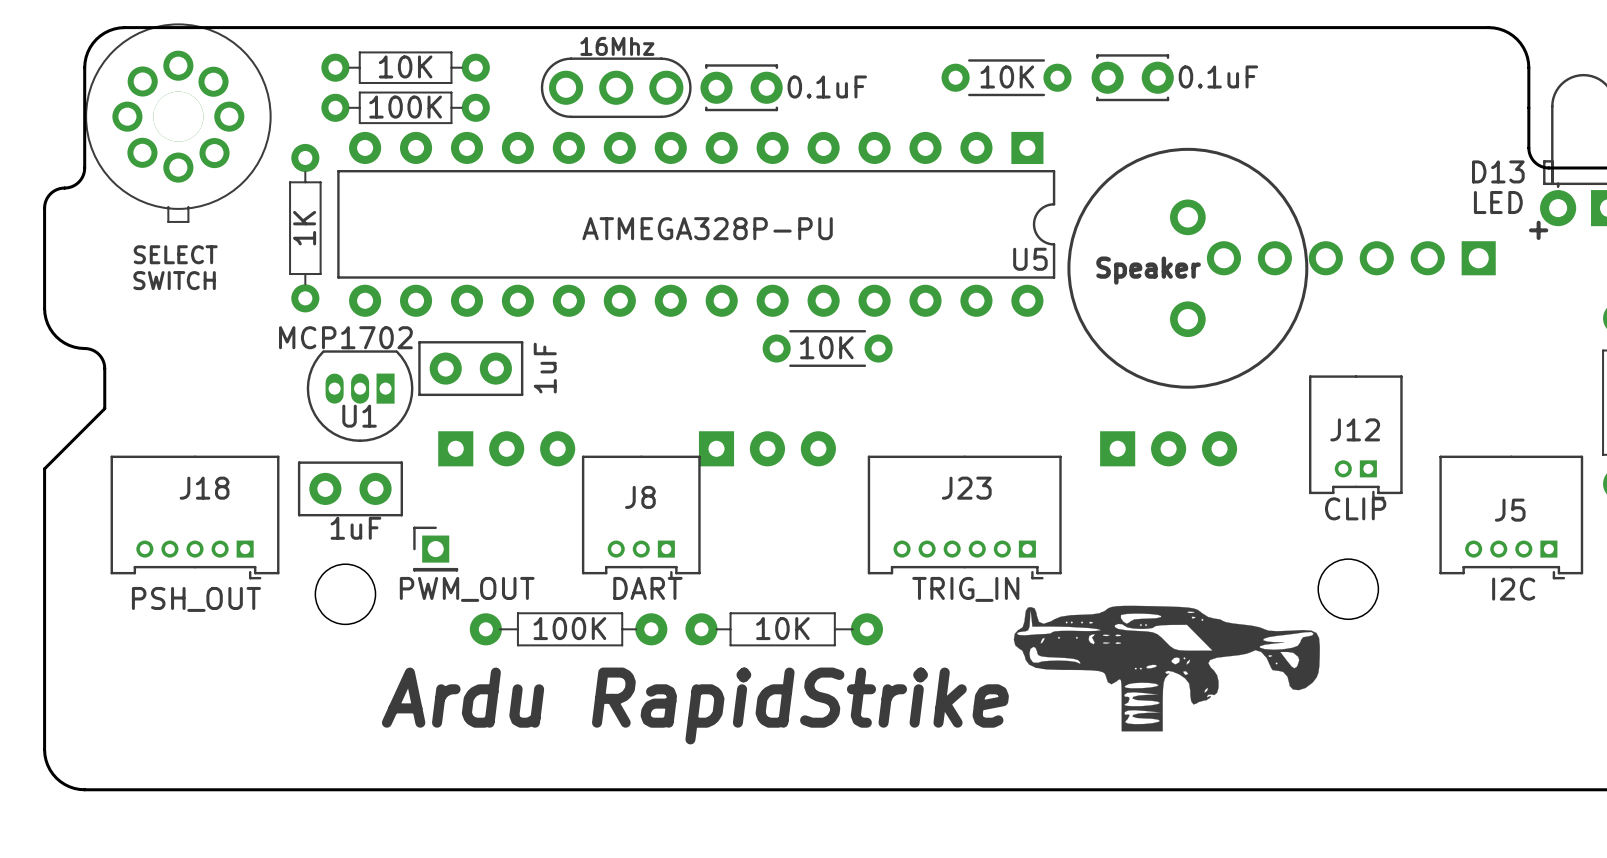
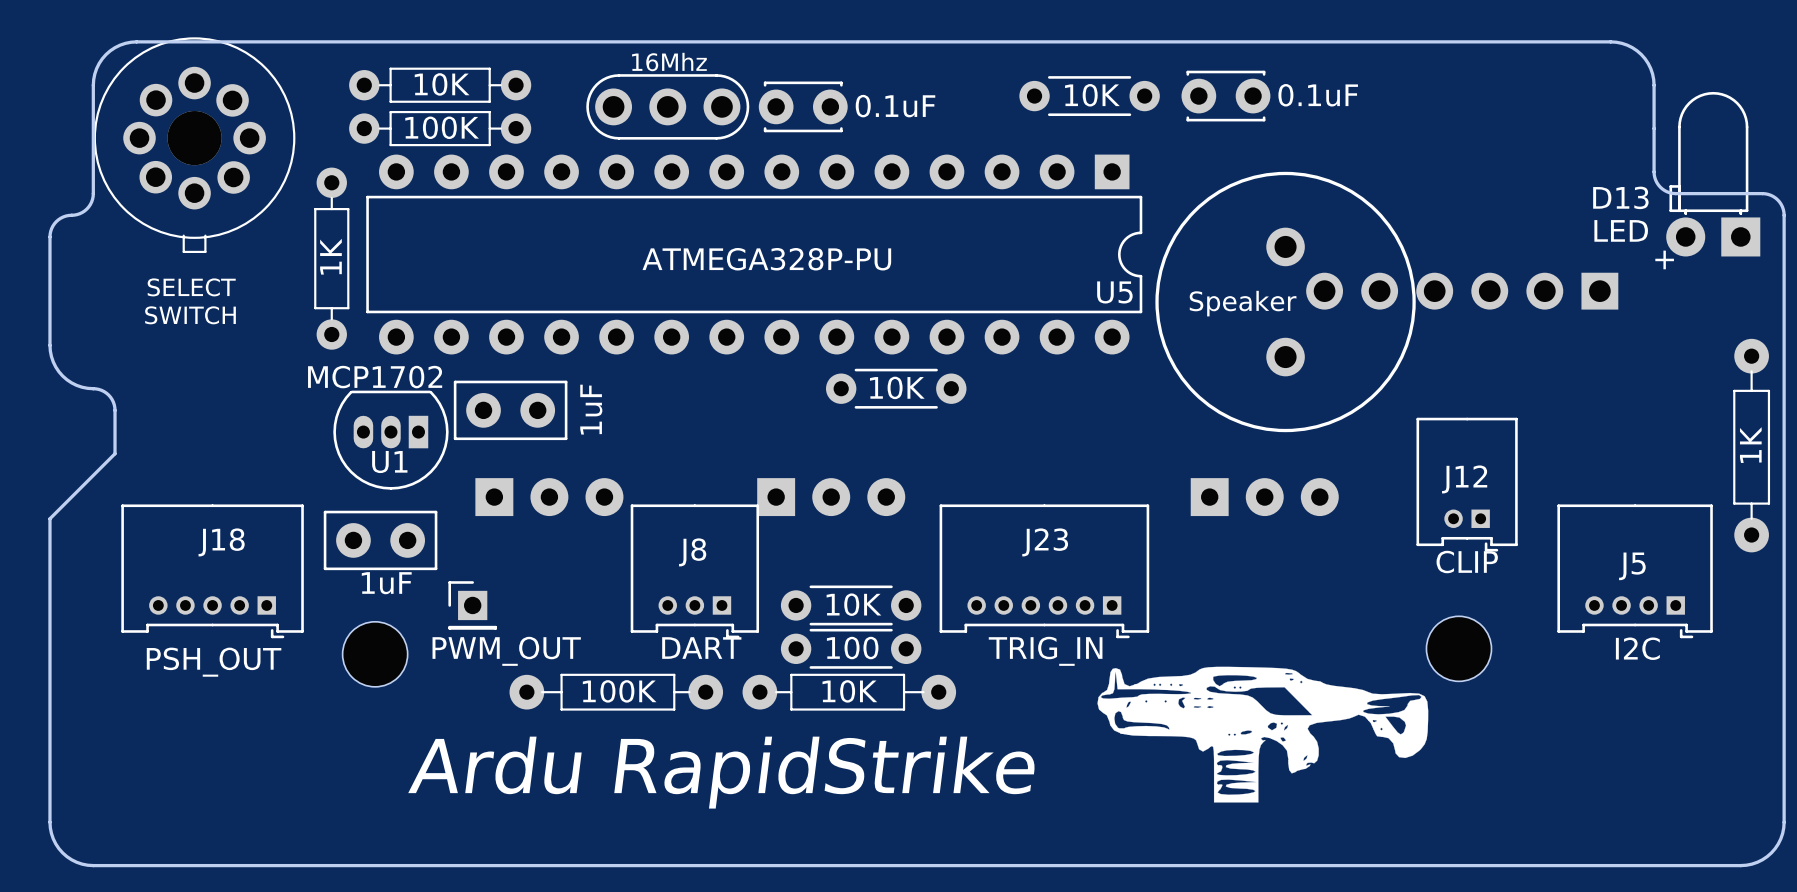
part: none -> 10K (851, 605)
part: none -> 100 (851, 648)

